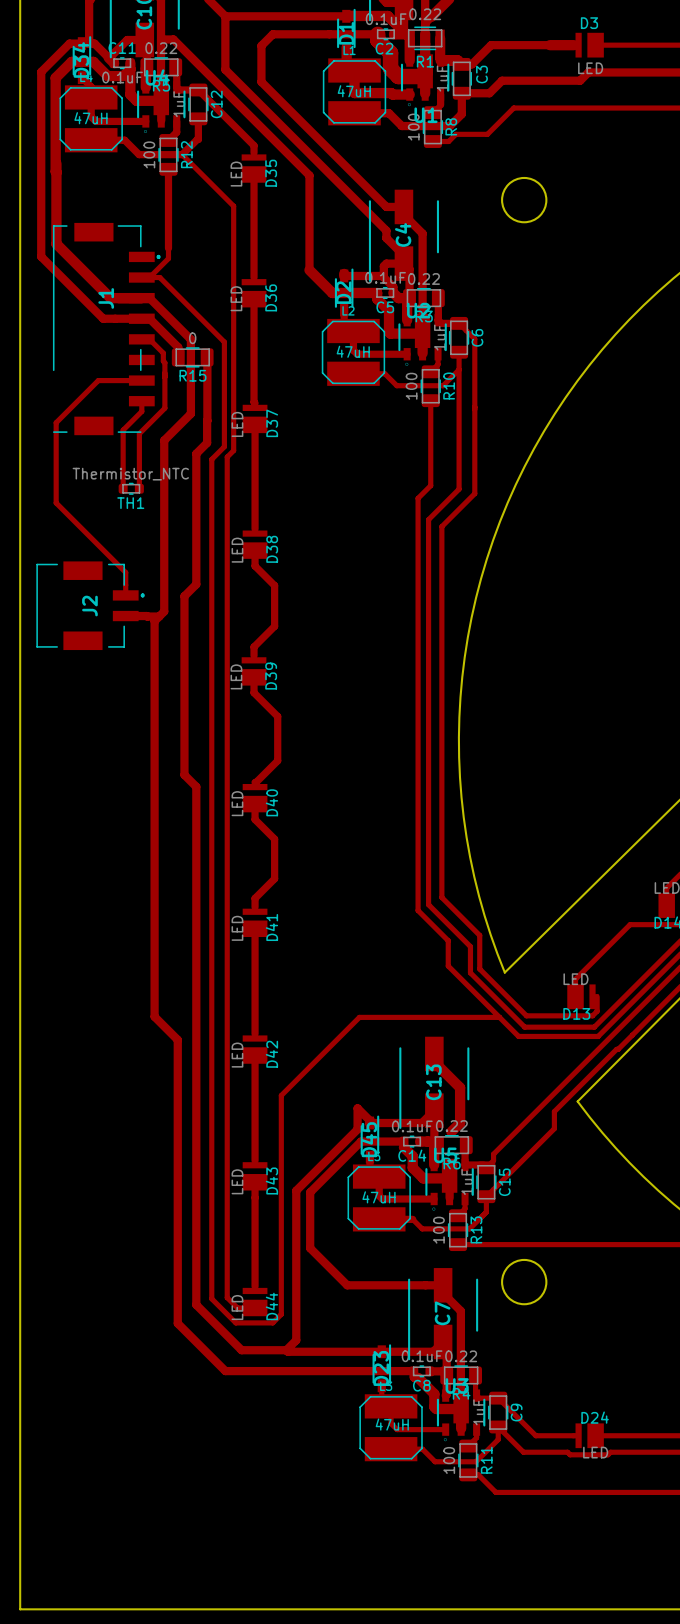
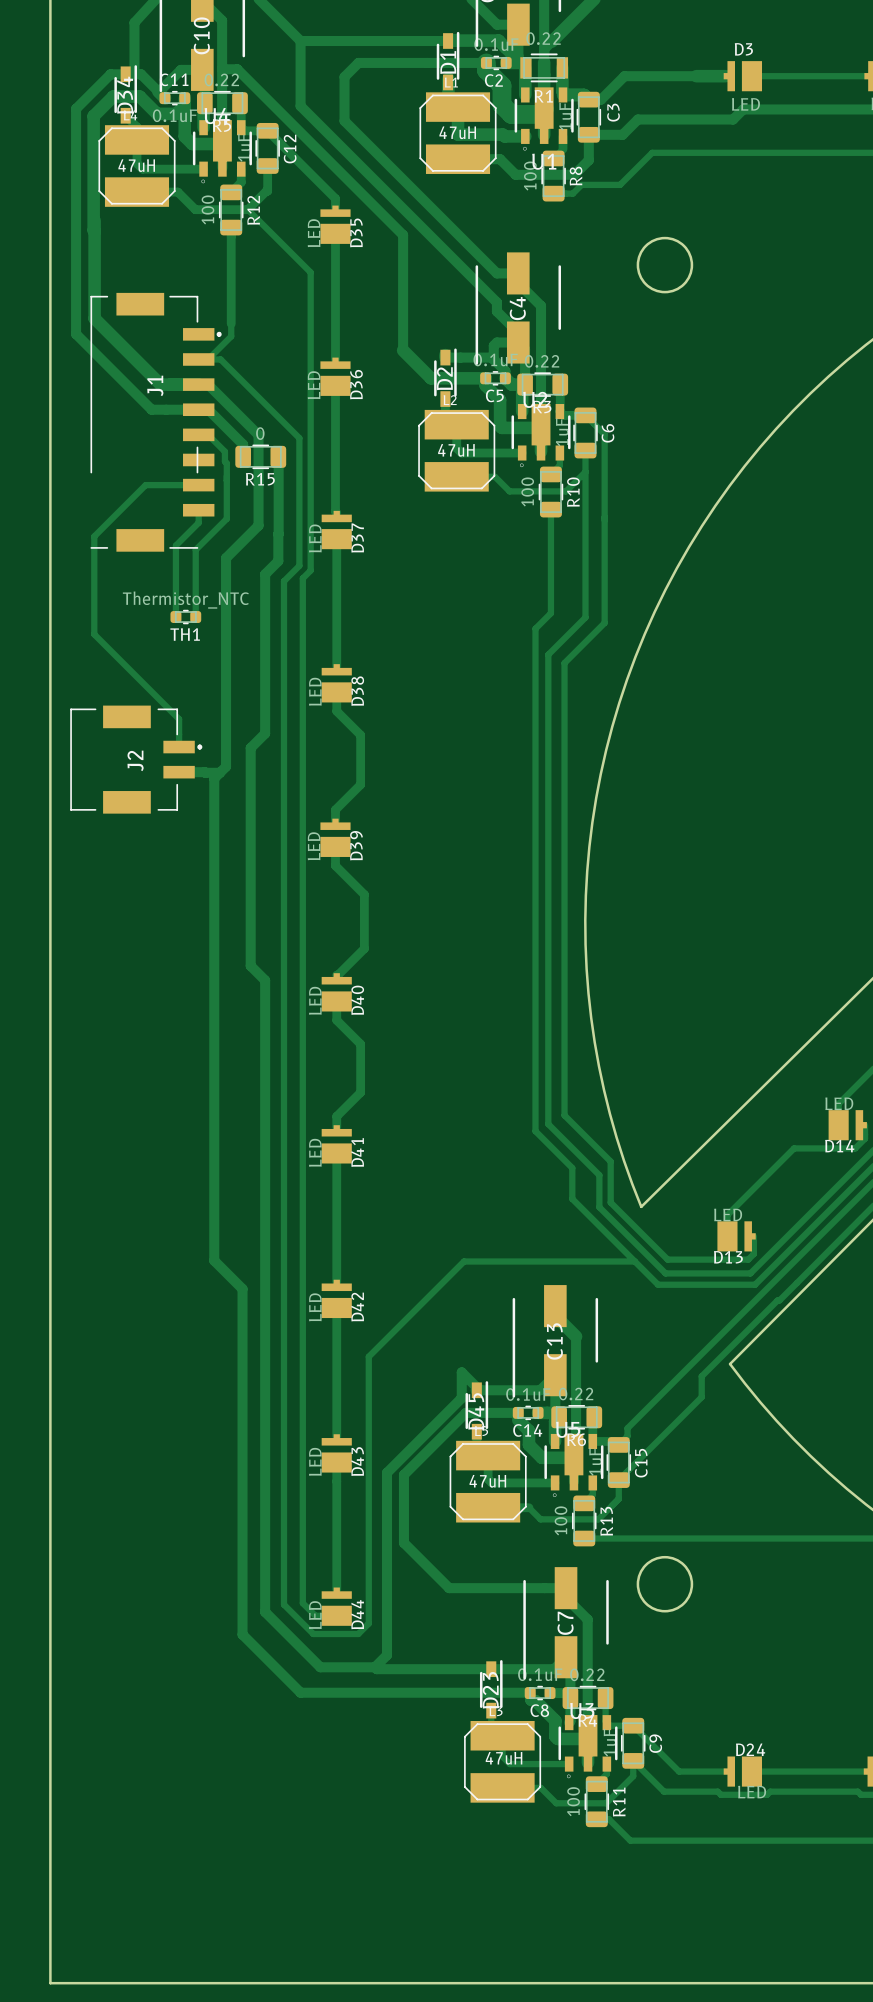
track: (451, 1078) (460, 1087) (460, 1123) (451, 1131) -> (576, 1336) (576, 1452) (573, 1454)

